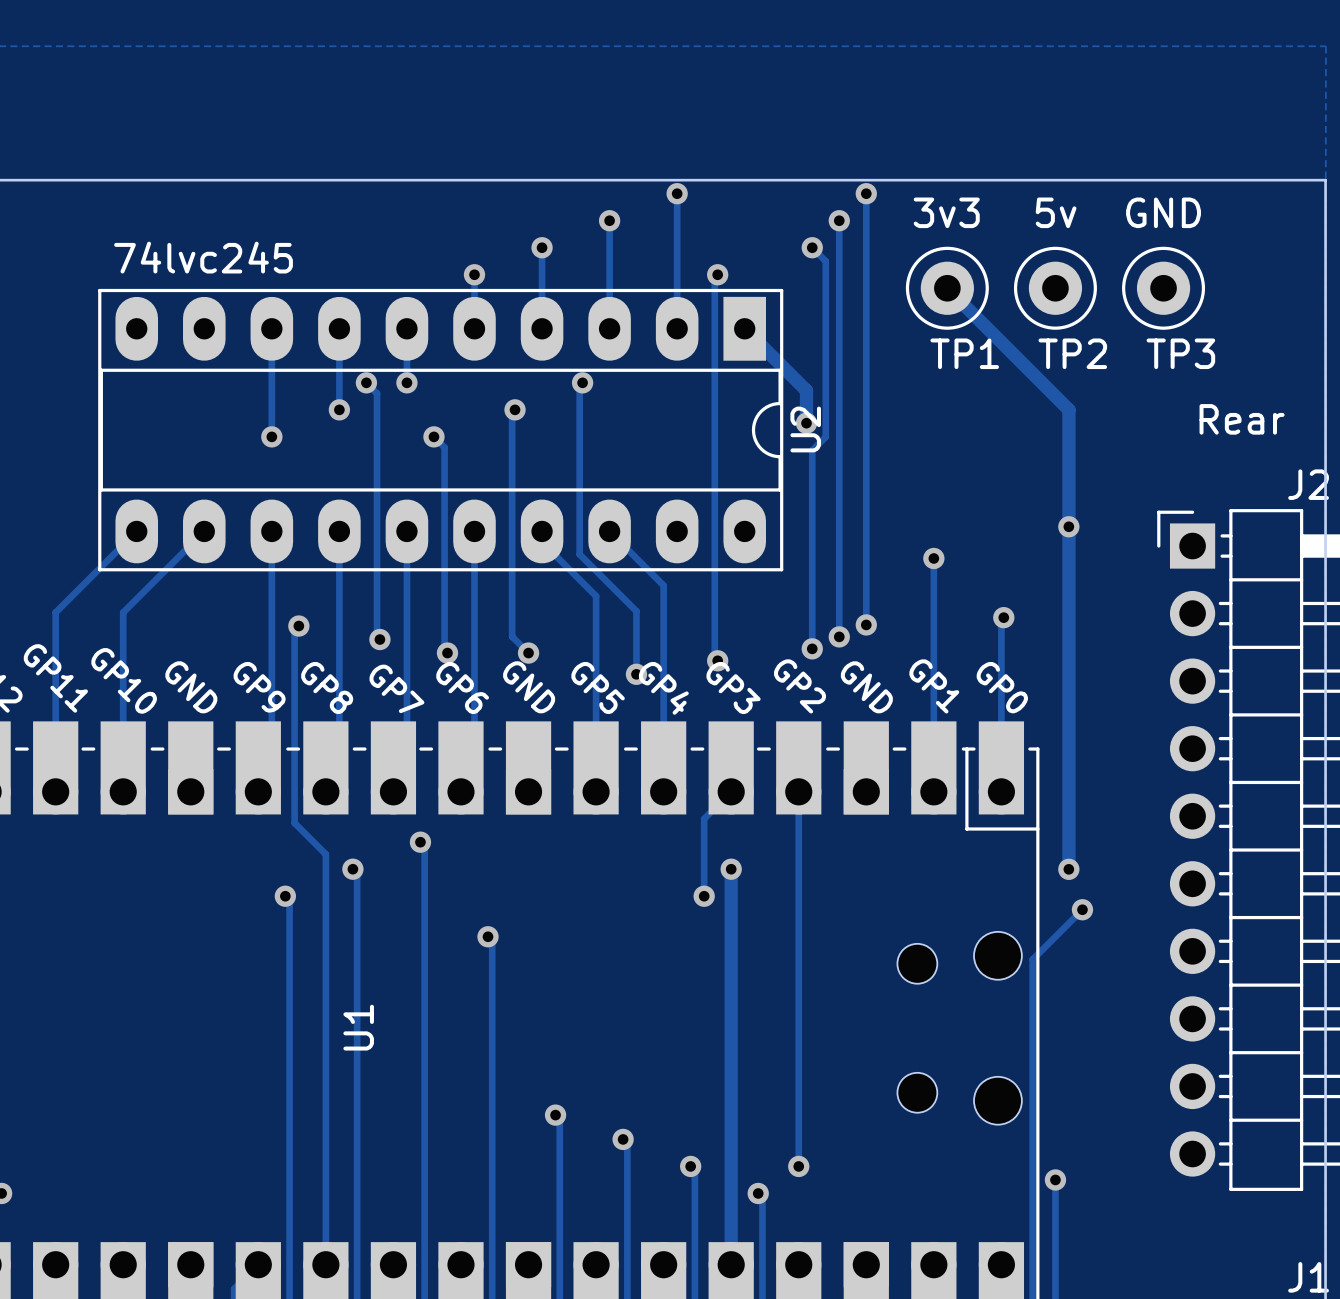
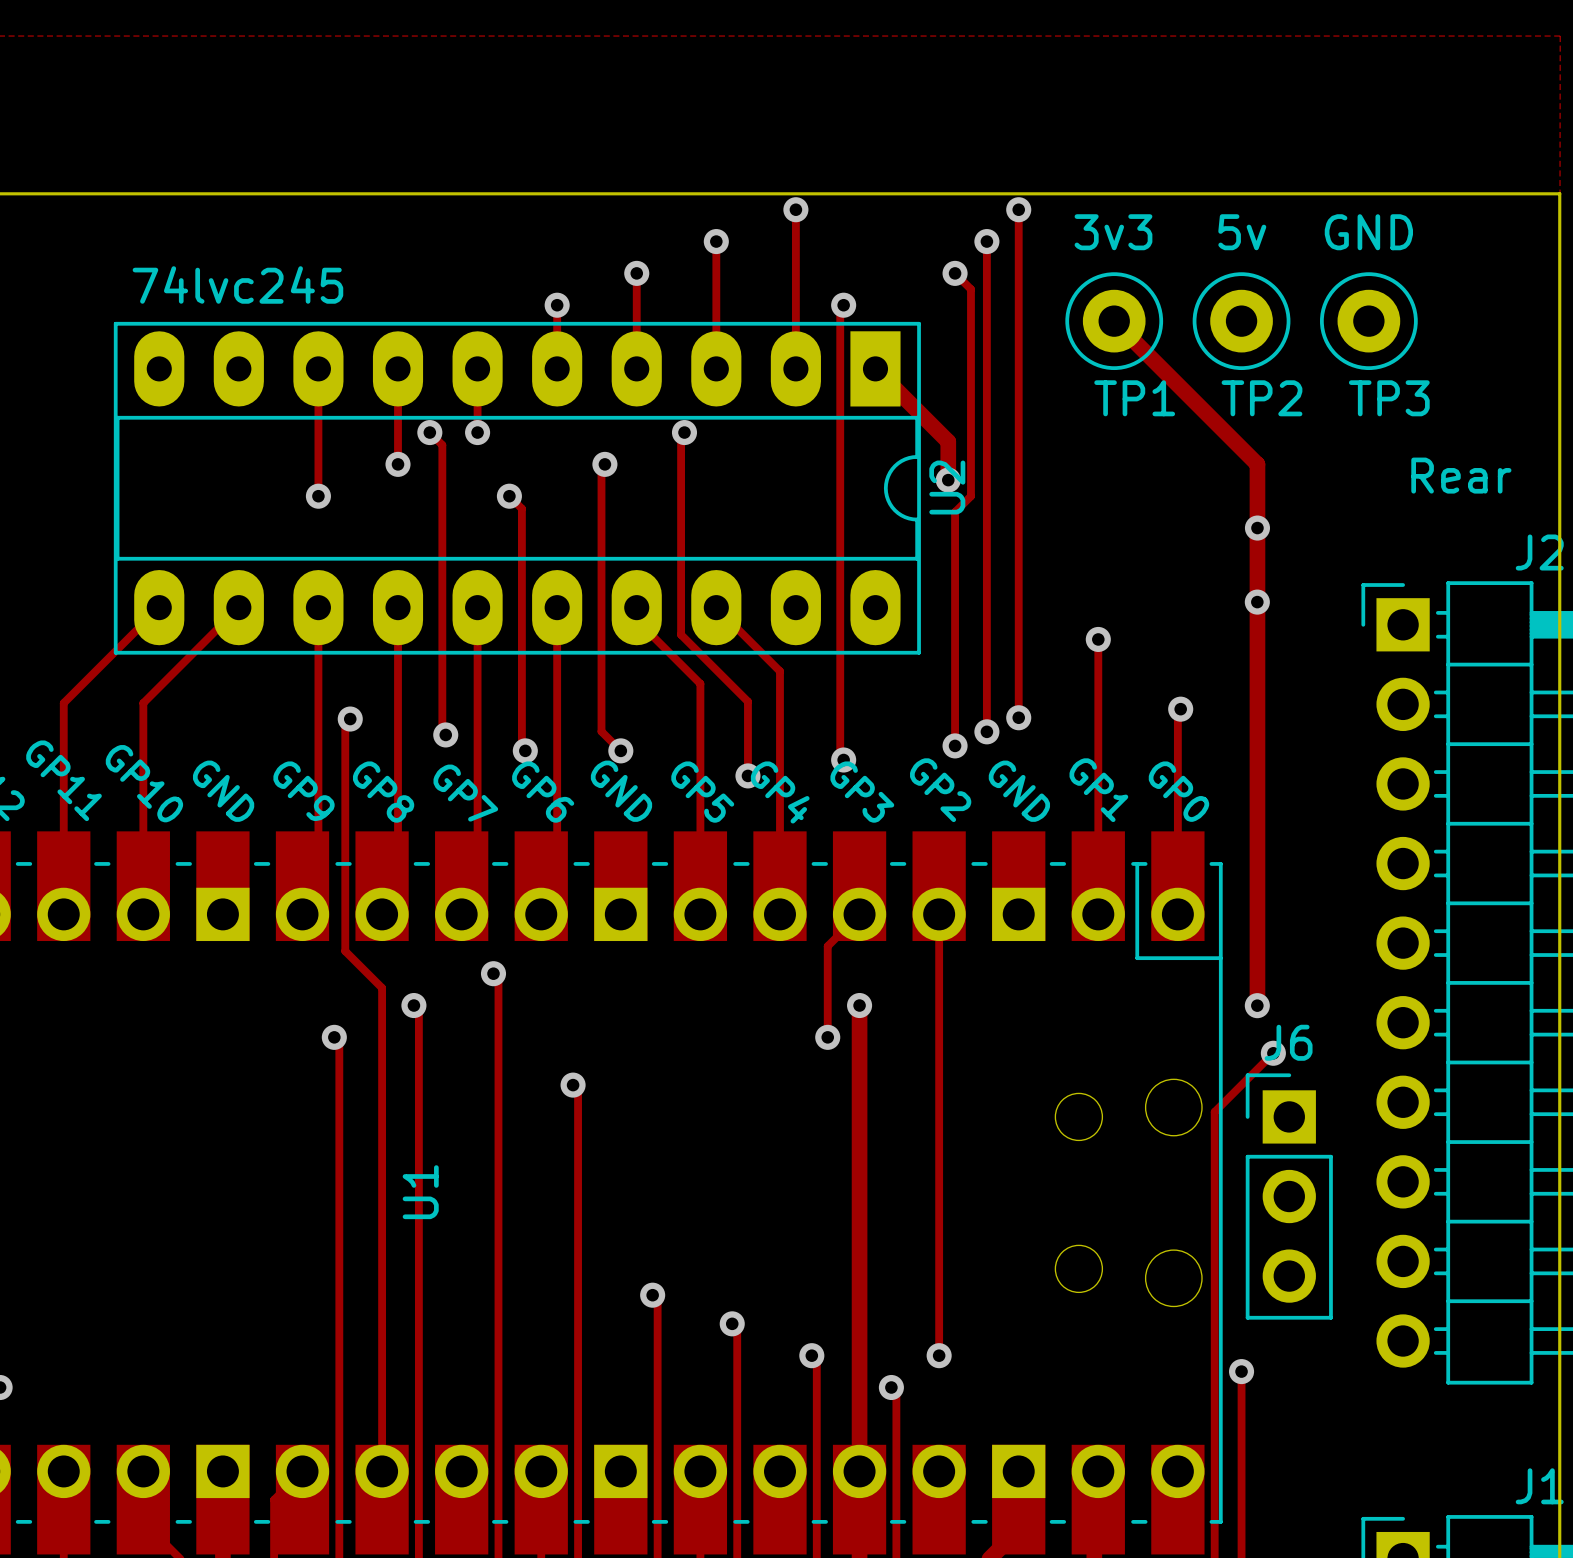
via: none -> (1257, 528)
J6: none -> (1289, 1196)

